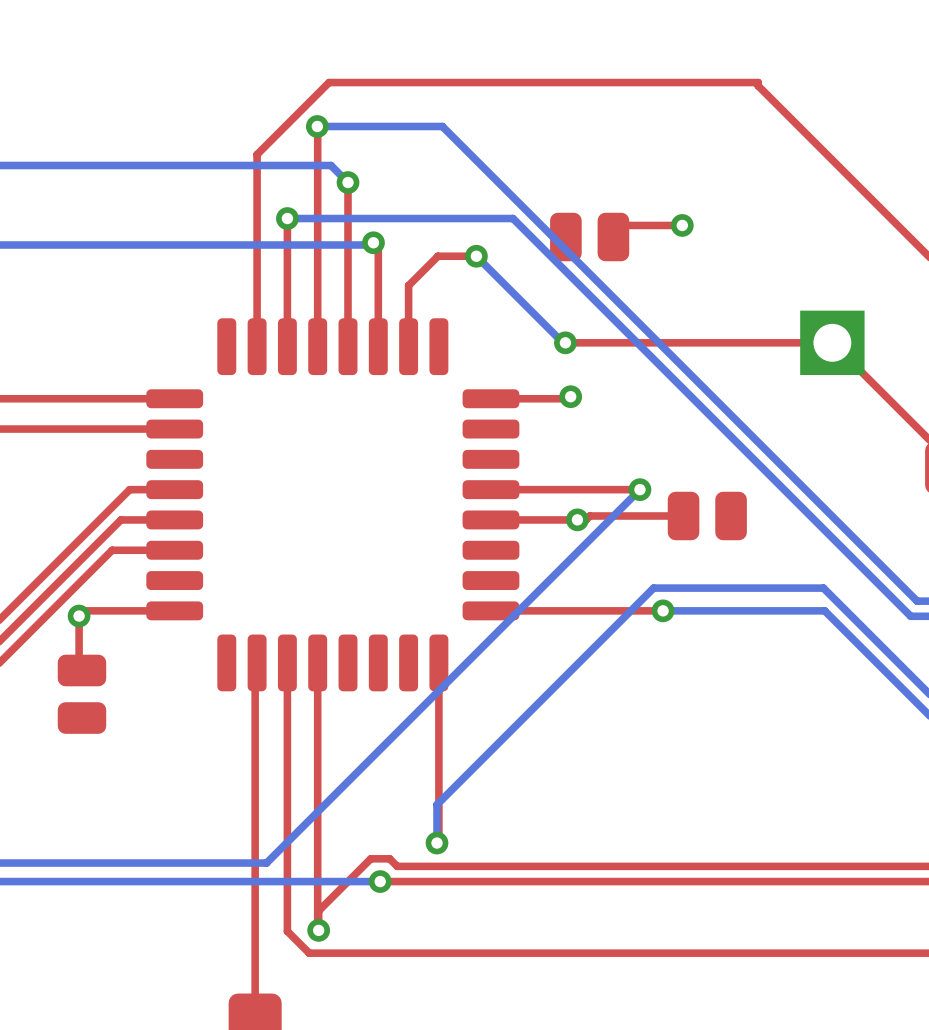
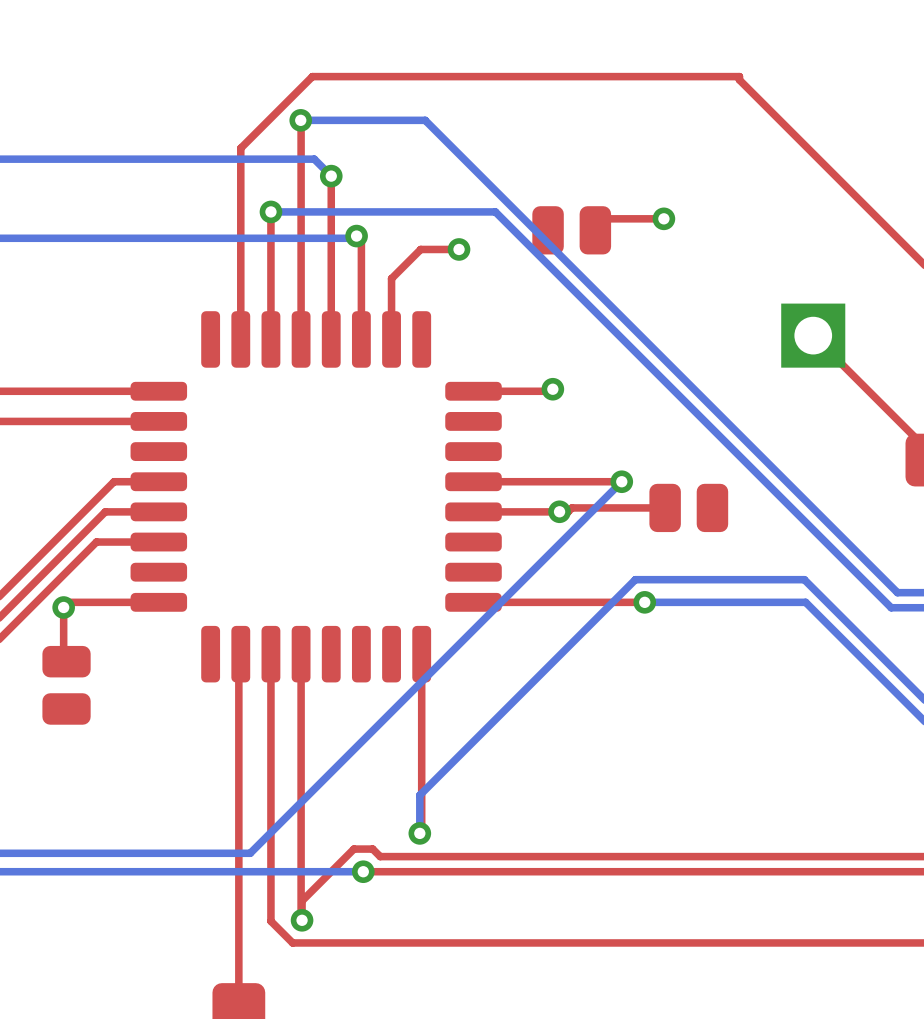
bottom track: (476, 256) (563, 342) (565, 342) -> none
via: (565, 342) -> none
top track: (832, 342) (563, 342) -> none

